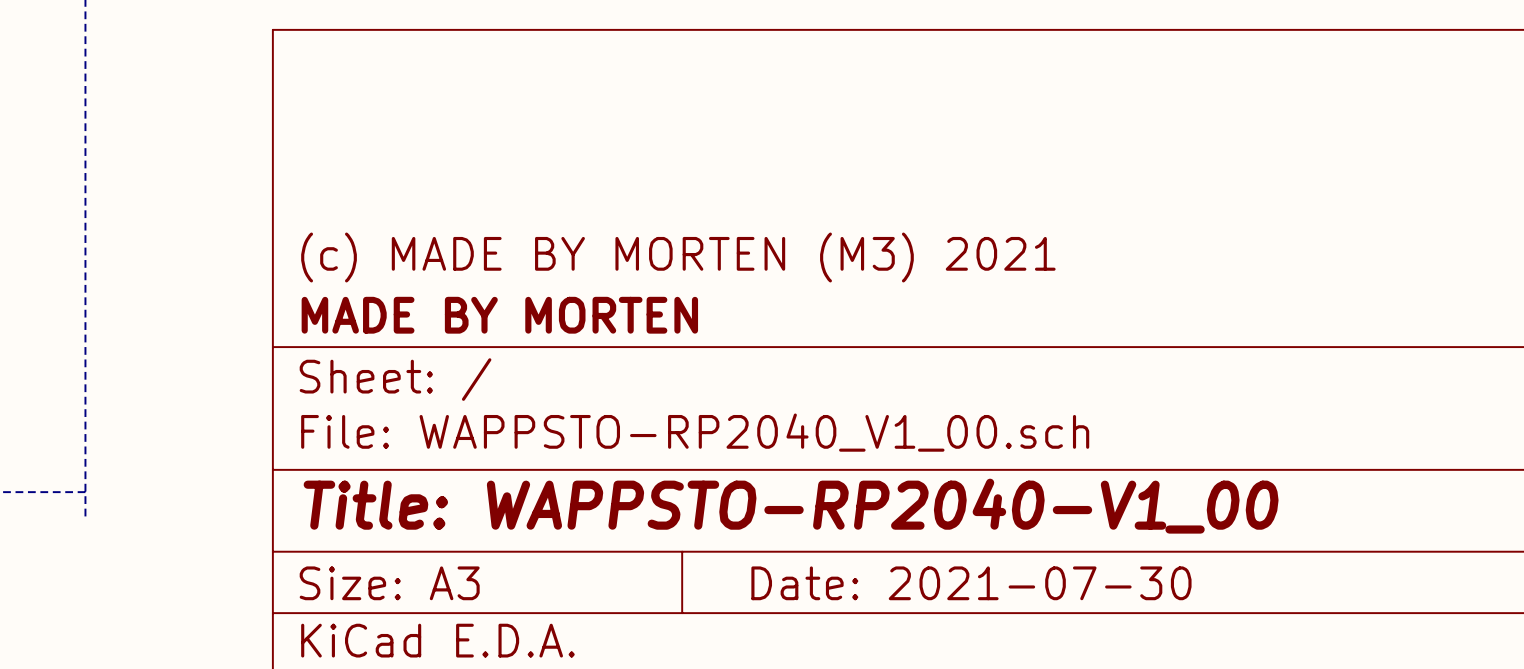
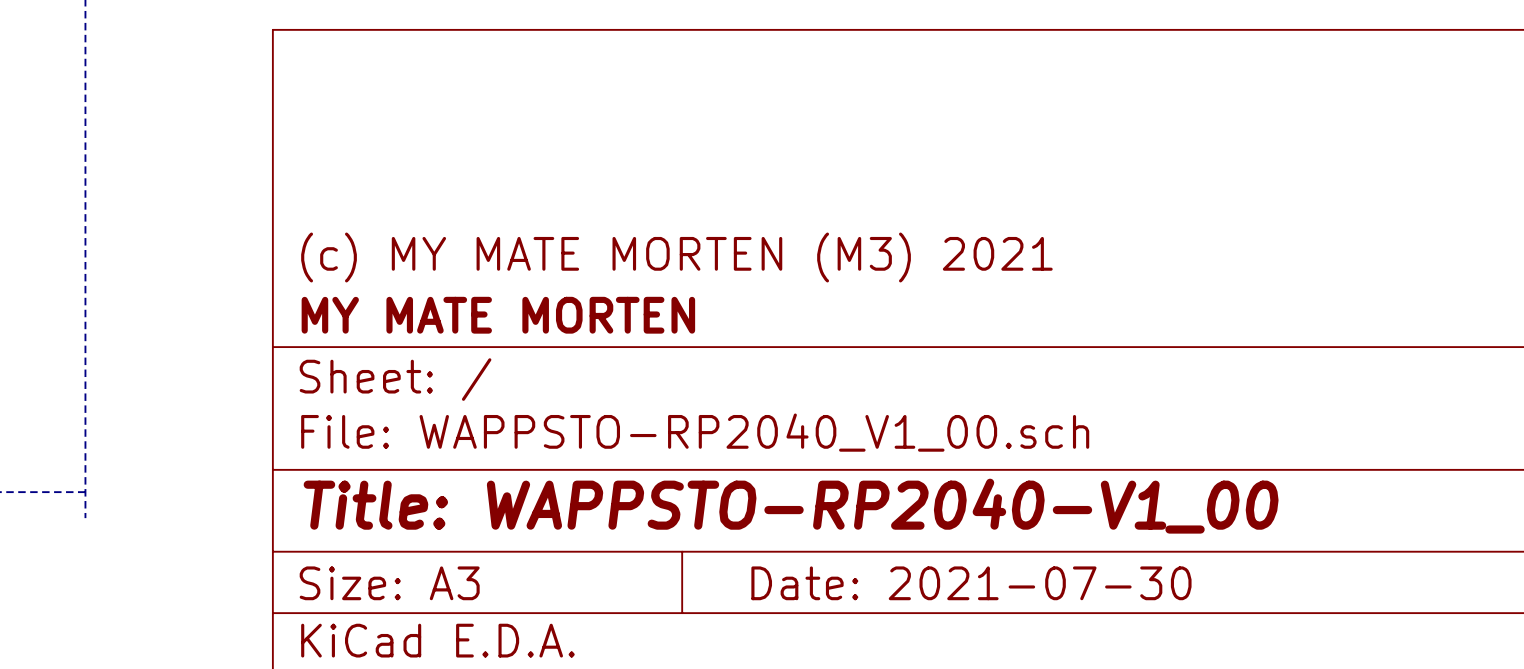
title block: (c) MADE BY MORTEN (M3) 2021 (678, 257) -> (c) MY MATE MORTEN (M3) 2021 (676, 257)
title block: MADE BY MORTEN (499, 315) -> MY MATE MORTEN (498, 315)

